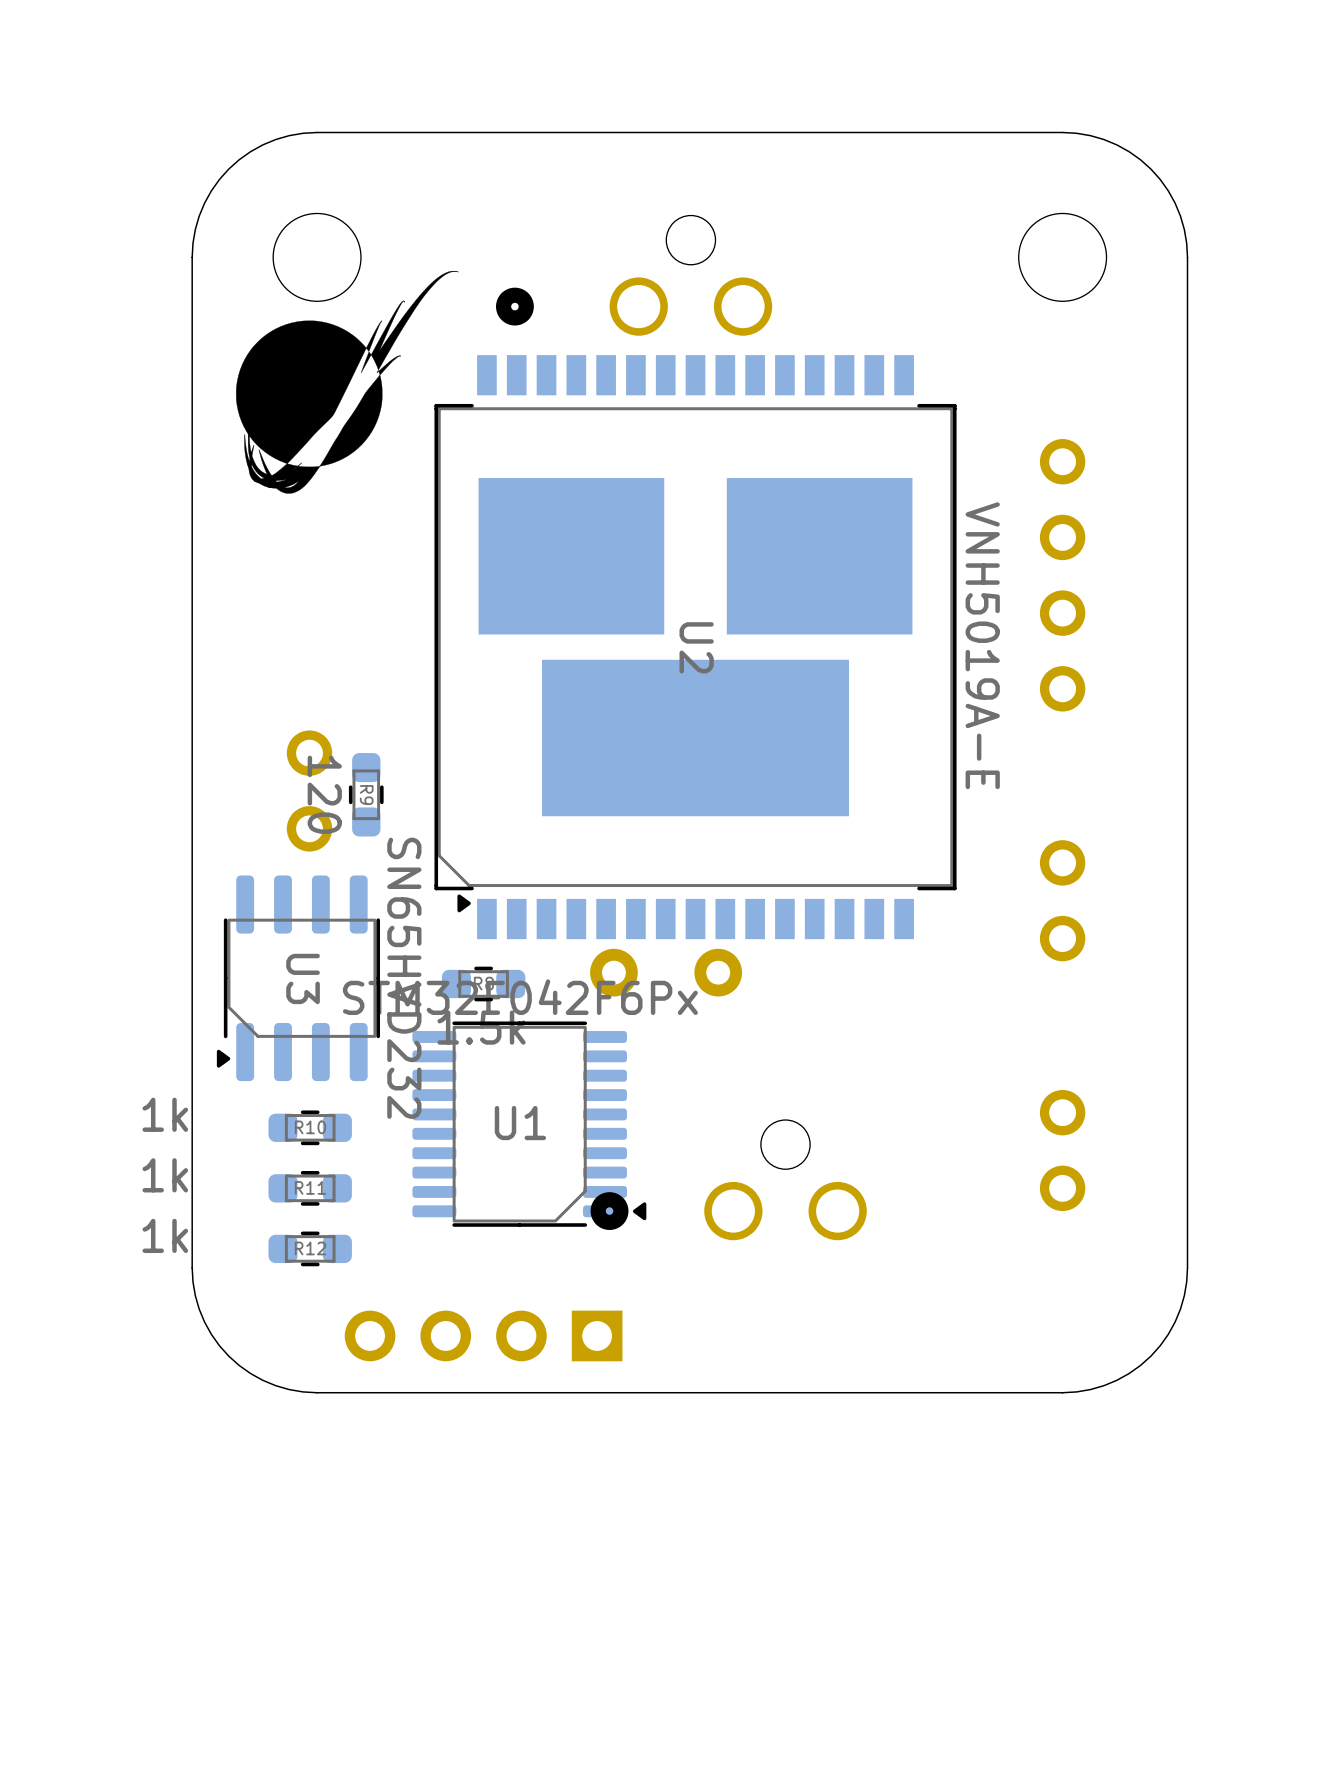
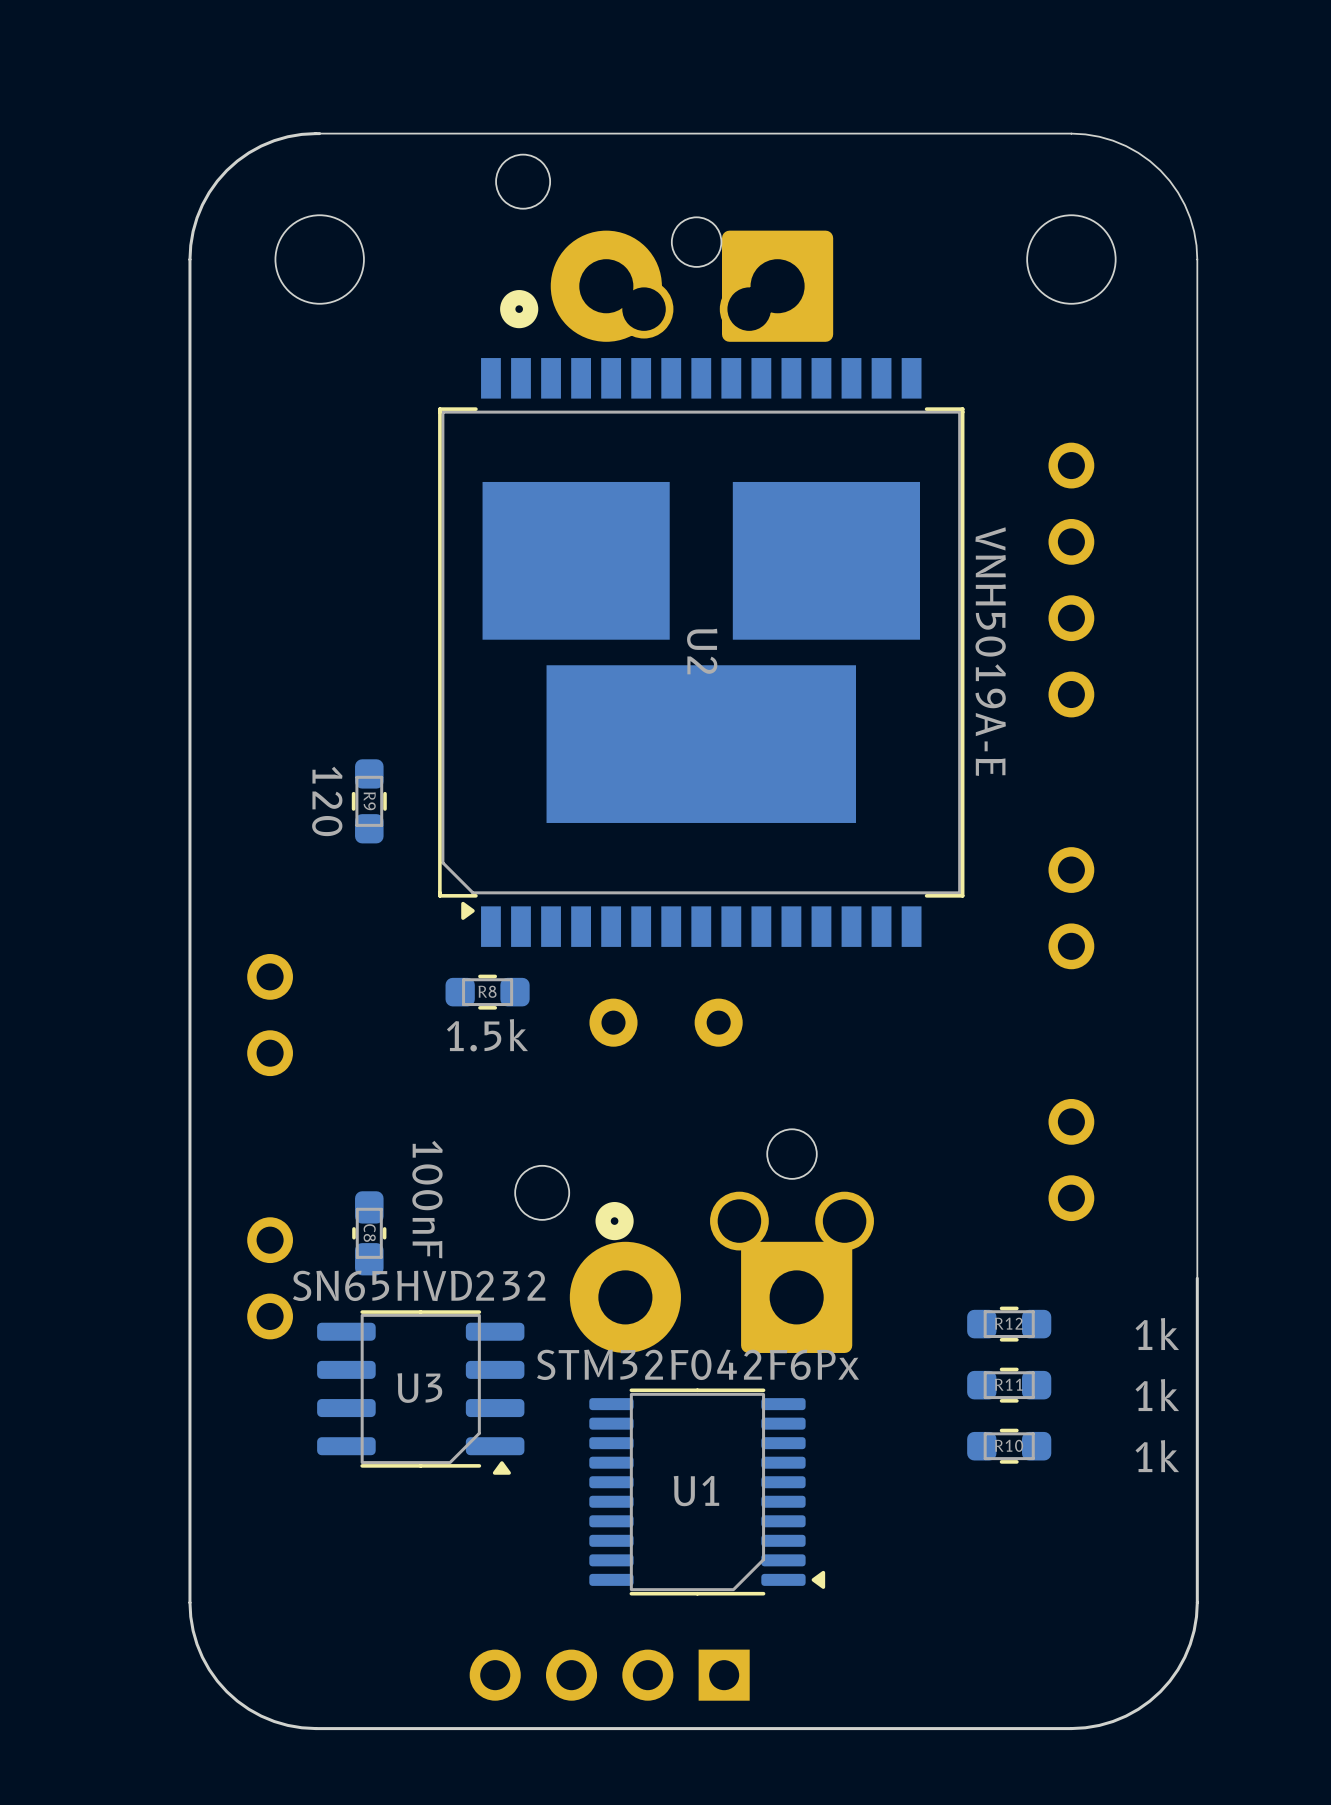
board edge: (317, 132) (303, 133) (275, 139) (262, 144) (239, 159) (219, 179) (211, 190) (199, 216) (192, 243) (192, 1267) (192, 1281) (199, 1309) (211, 1334) (219, 1345) (239, 1365) (262, 1380) (289, 1389) (317, 1392) (1076, 1391) (1090, 1389) (1116, 1380) (1140, 1365) (1160, 1345) (1175, 1322) (1180, 1309) (1186, 1281) (1187, 1267) -> (319, 133) (301, 134) (274, 140) (261, 146) (237, 161) (226, 170) (209, 192) (197, 217) (190, 245) (189, 1602) (190, 1616) (197, 1644) (209, 1669) (217, 1681) (237, 1701) (261, 1716) (287, 1725) (315, 1728) (1071, 1728) (1099, 1725) (1112, 1721) (1138, 1709) (1160, 1691) (1178, 1669) (1190, 1644) (1194, 1630) (1197, 1602) (1197, 1278)
part: none -> (664, 248)
drawing: [236, 270, 459, 494] -> none
part position: (309, 790) -> (270, 1015)
part position: (666, 972) -> (666, 1022)
U3 rotation: 0° (298, 978) -> 90° counterclockwise (420, 1392)
U3 position: (298, 978) -> (420, 1392)
R10 value position: 1k (165, 1114) -> 1k (1157, 1456)
U1 position: (529, 1124) -> (707, 1492)
R10 position: (310, 1127) -> (1009, 1446)
R11 value position: 1k (165, 1175) -> 1k (1157, 1395)
R11 position: (310, 1188) -> (1009, 1385)
C8: none -> 100nF (369, 1233)
R12 value position: 1k (165, 1235) -> 1k (1157, 1334)
R12 position: (310, 1248) -> (1009, 1324)
part: none -> (683, 1259)
part: none -> (270, 1278)
part position: (483, 1335) -> (609, 1675)

